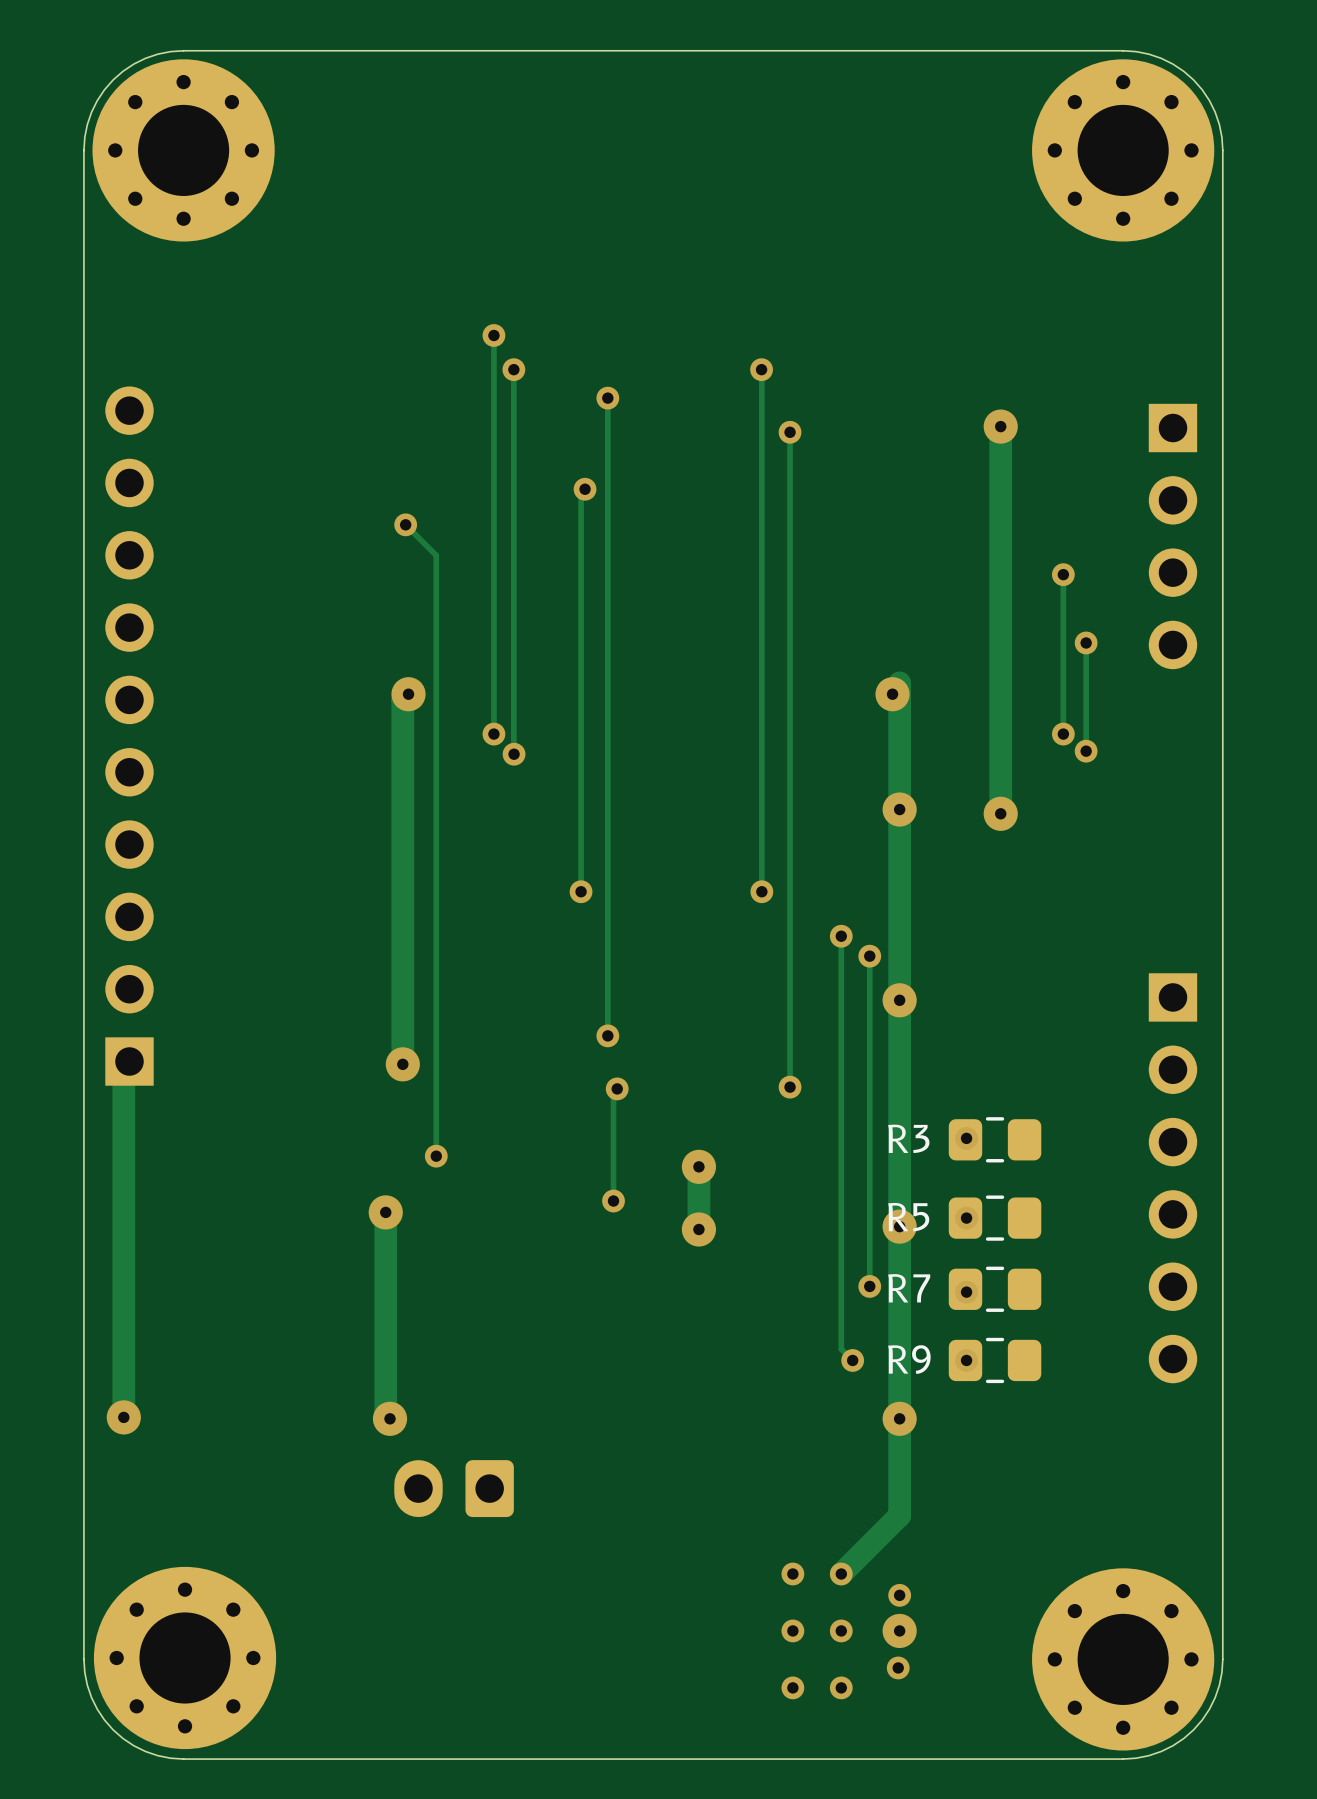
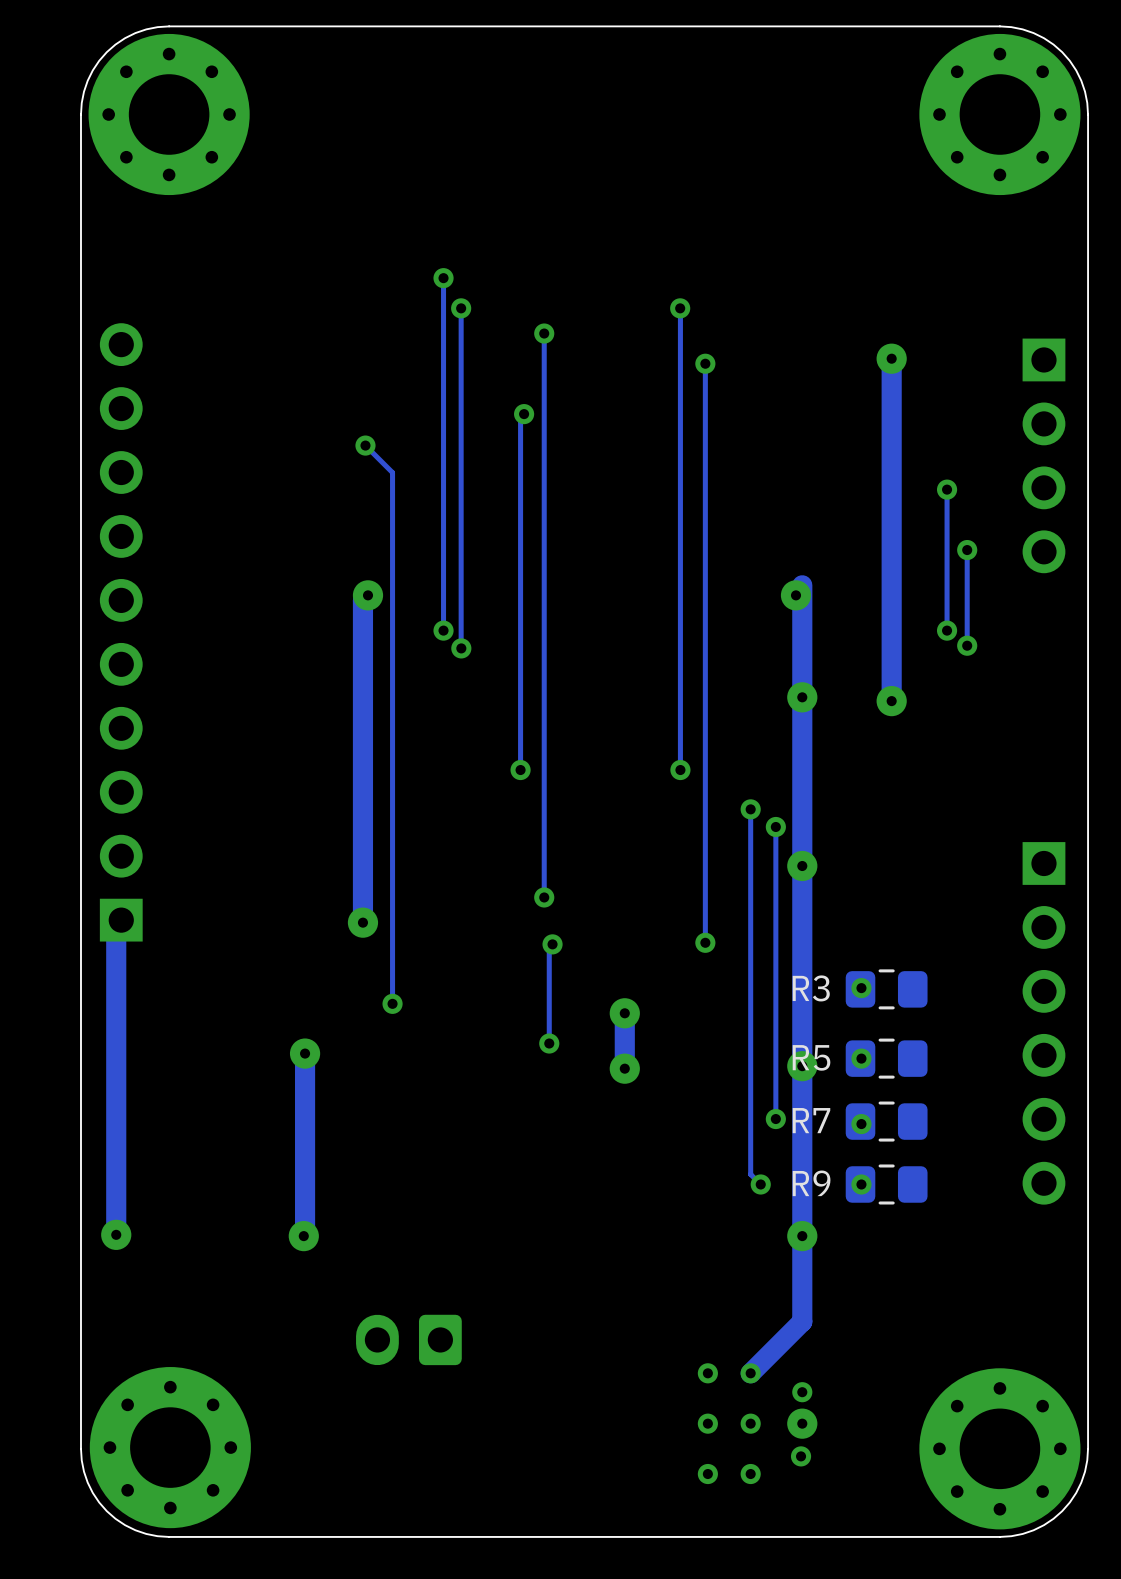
track: none -> (305, 1053) (303, 1236)
track: (385, 1212) (385, 1414) (390, 1418) -> none
via position: (385, 1212) -> (305, 1053)
via position: (390, 1418) -> (303, 1236)
part position: (454, 1488) -> (408, 1339)

